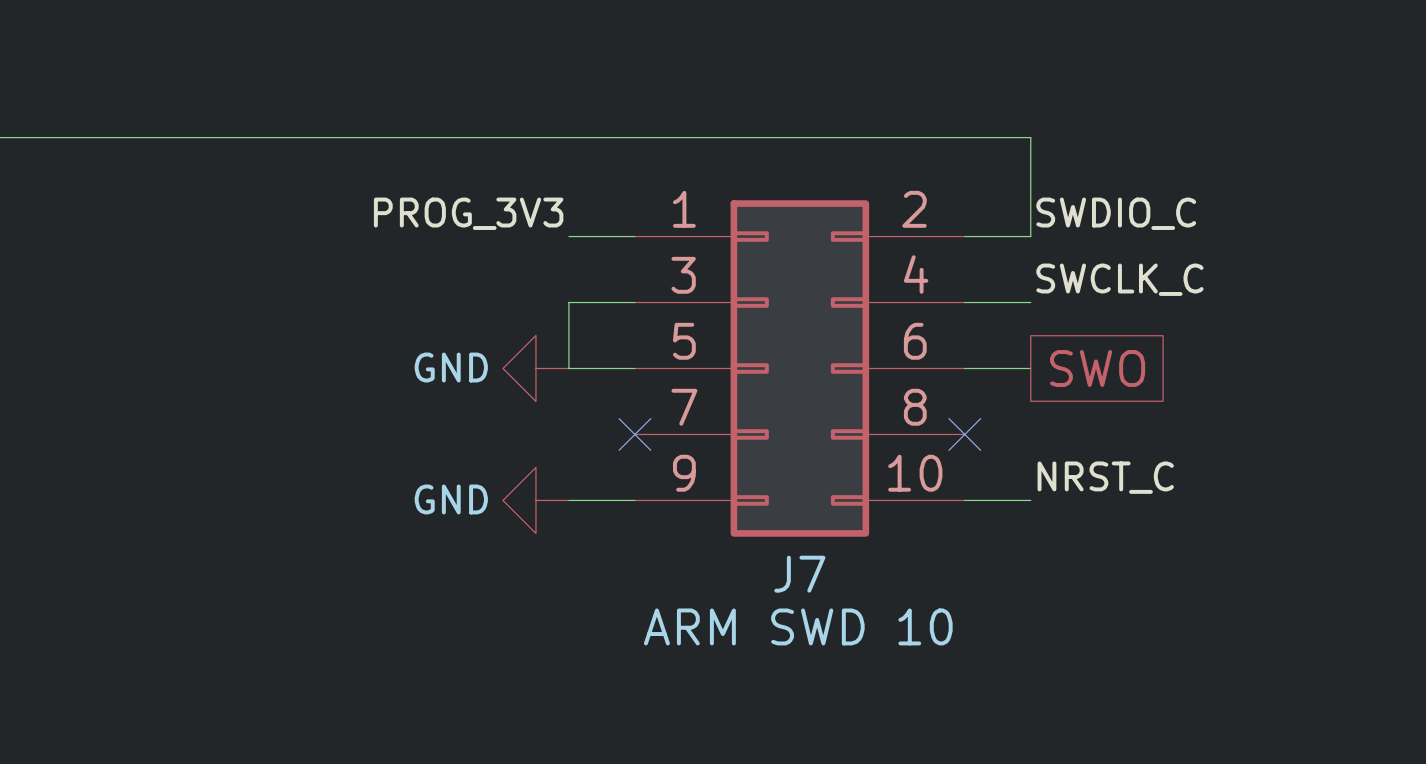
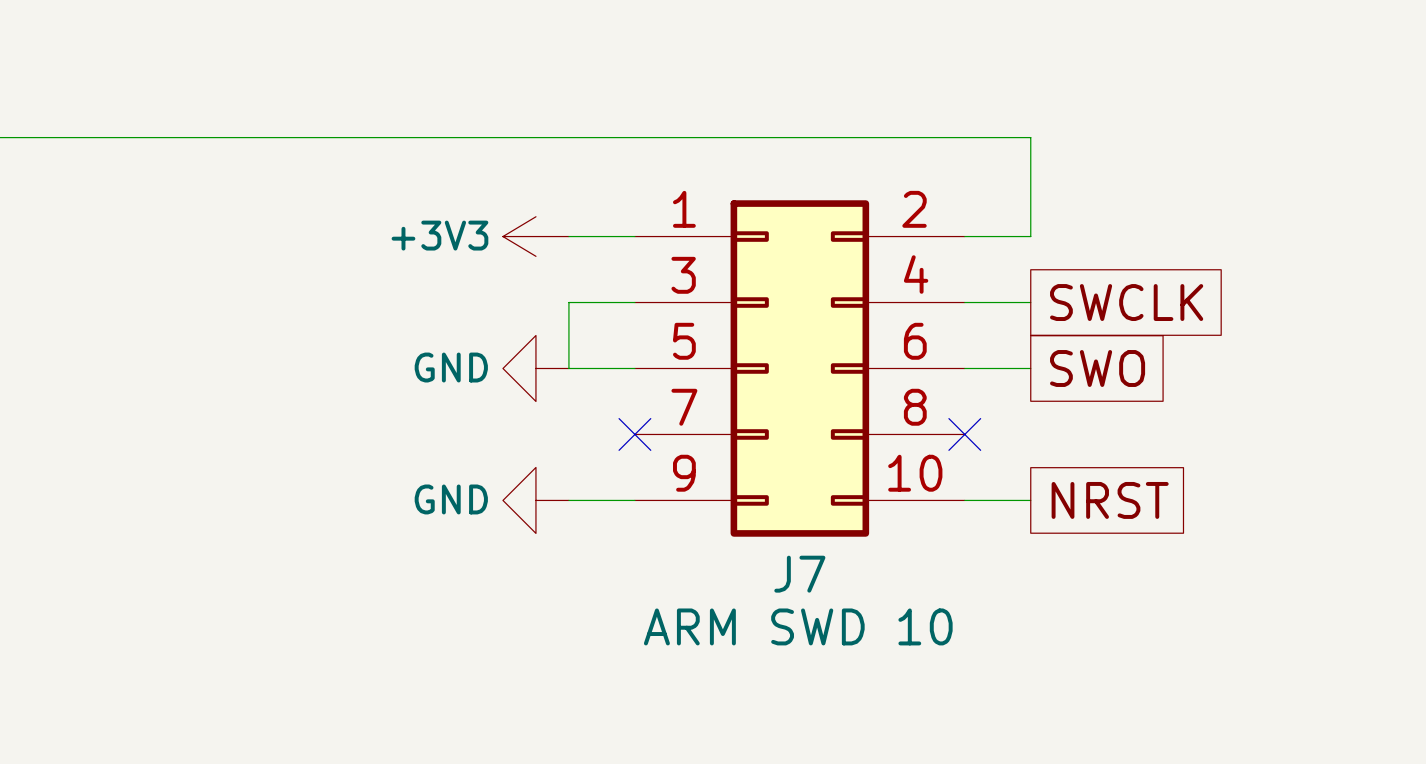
label: PROG_3V3 (468, 213) -> none
label: SWDIO_C (1116, 213) -> none
power symbol: none -> +3V3 (535, 236)
label: SWCLK_C (1119, 279) -> none
global label: none -> SWCLK (1126, 302)
label: NRST_C (1105, 477) -> none
global label: none -> NRST (1110, 500)

